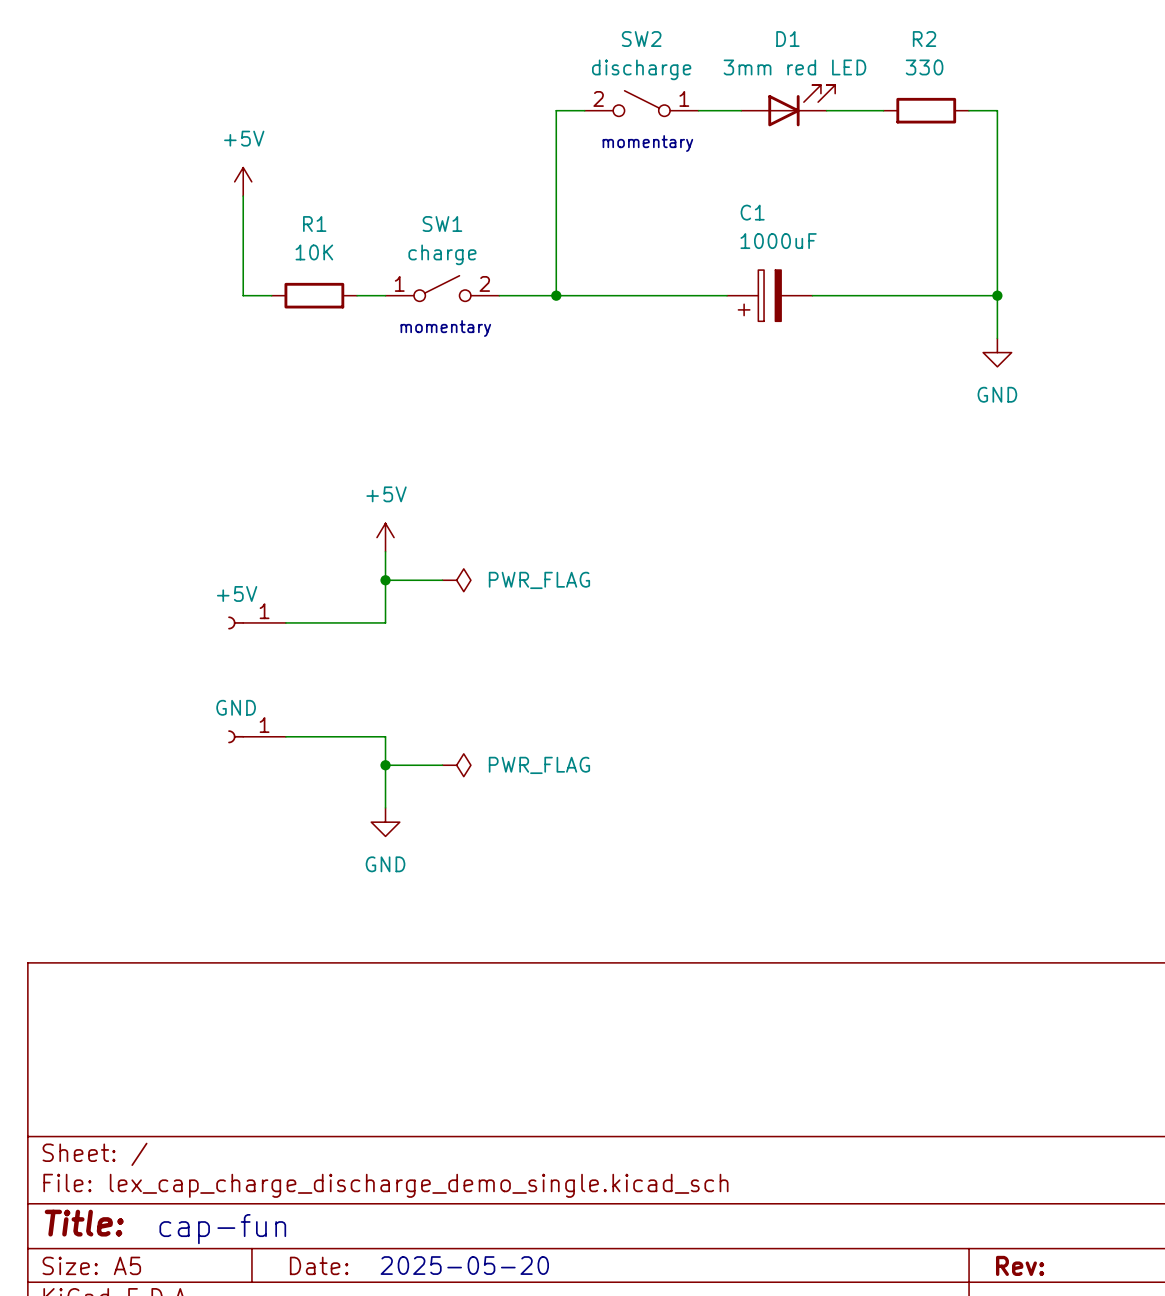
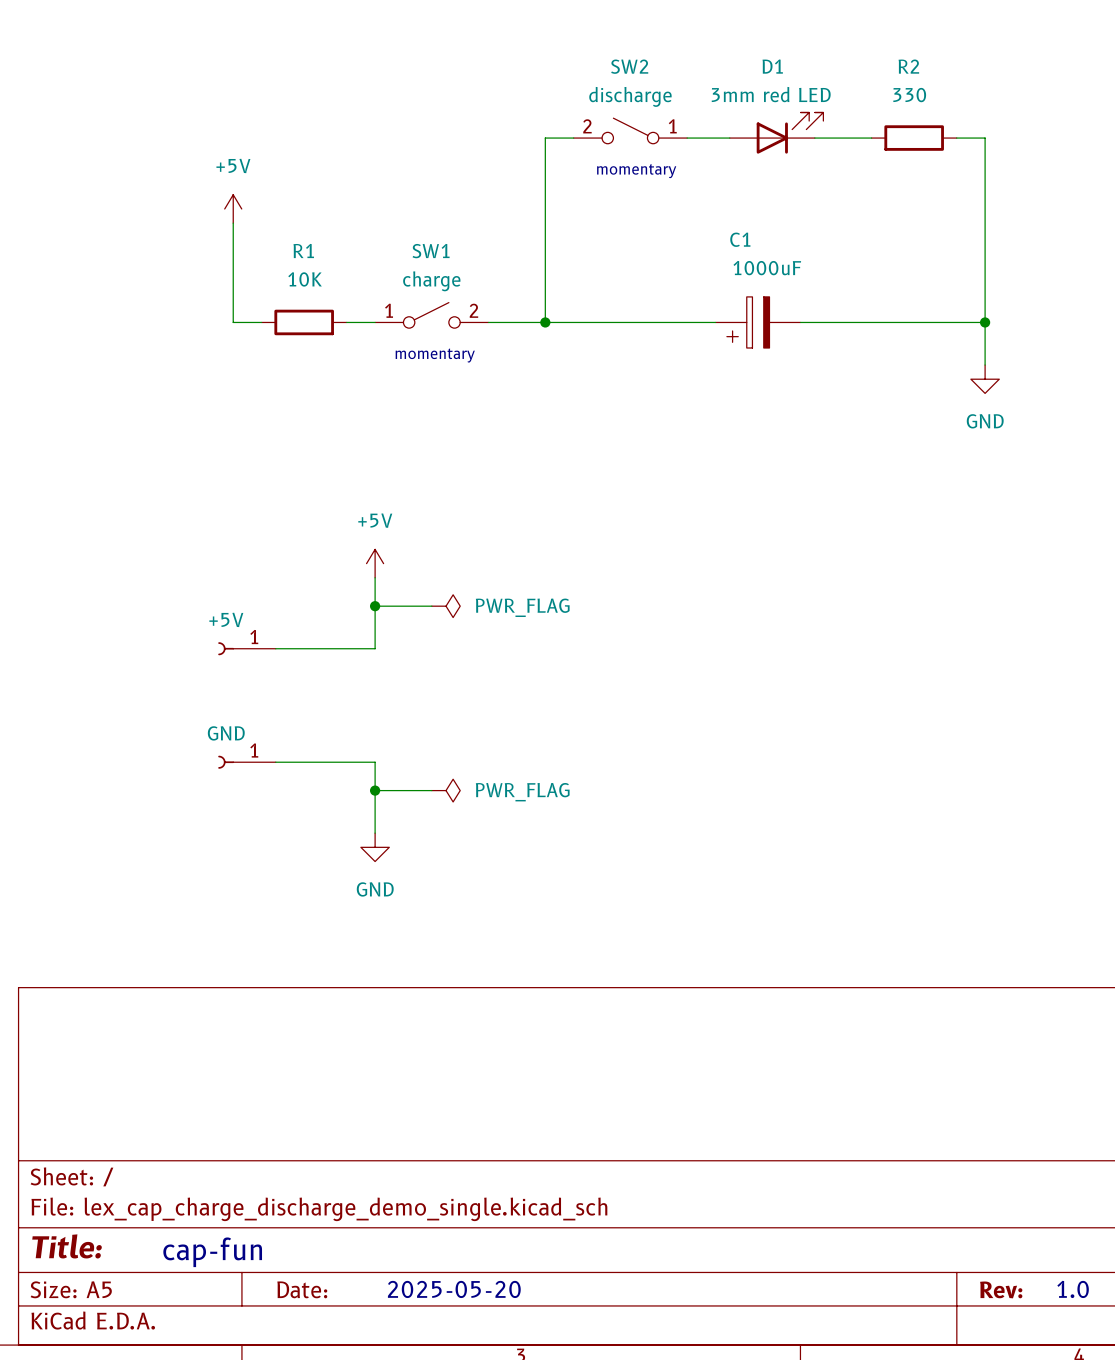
text: none -> 1.0 (1073, 1289)

